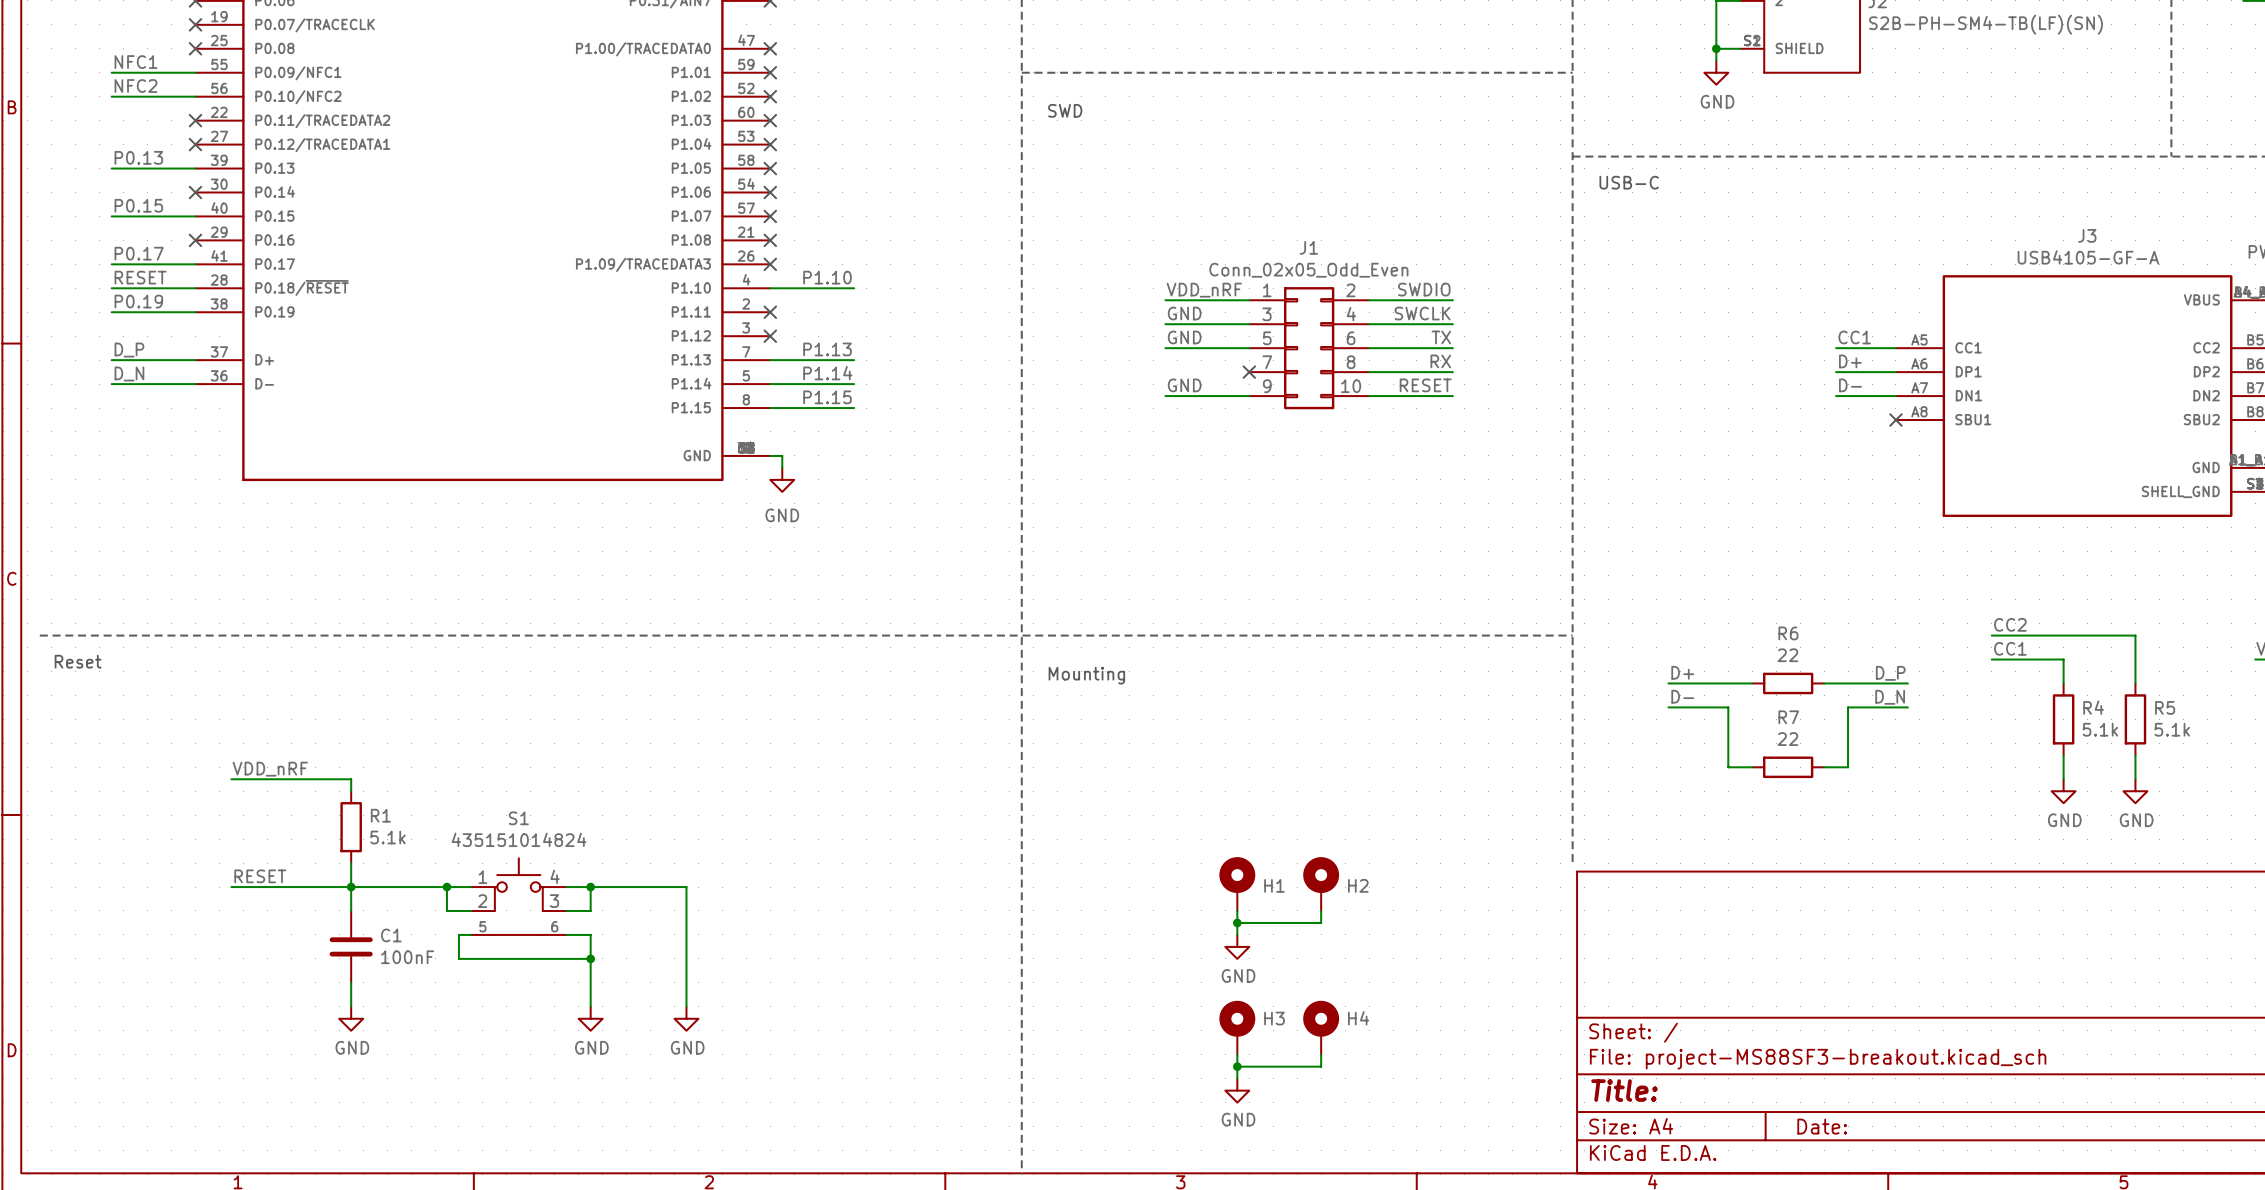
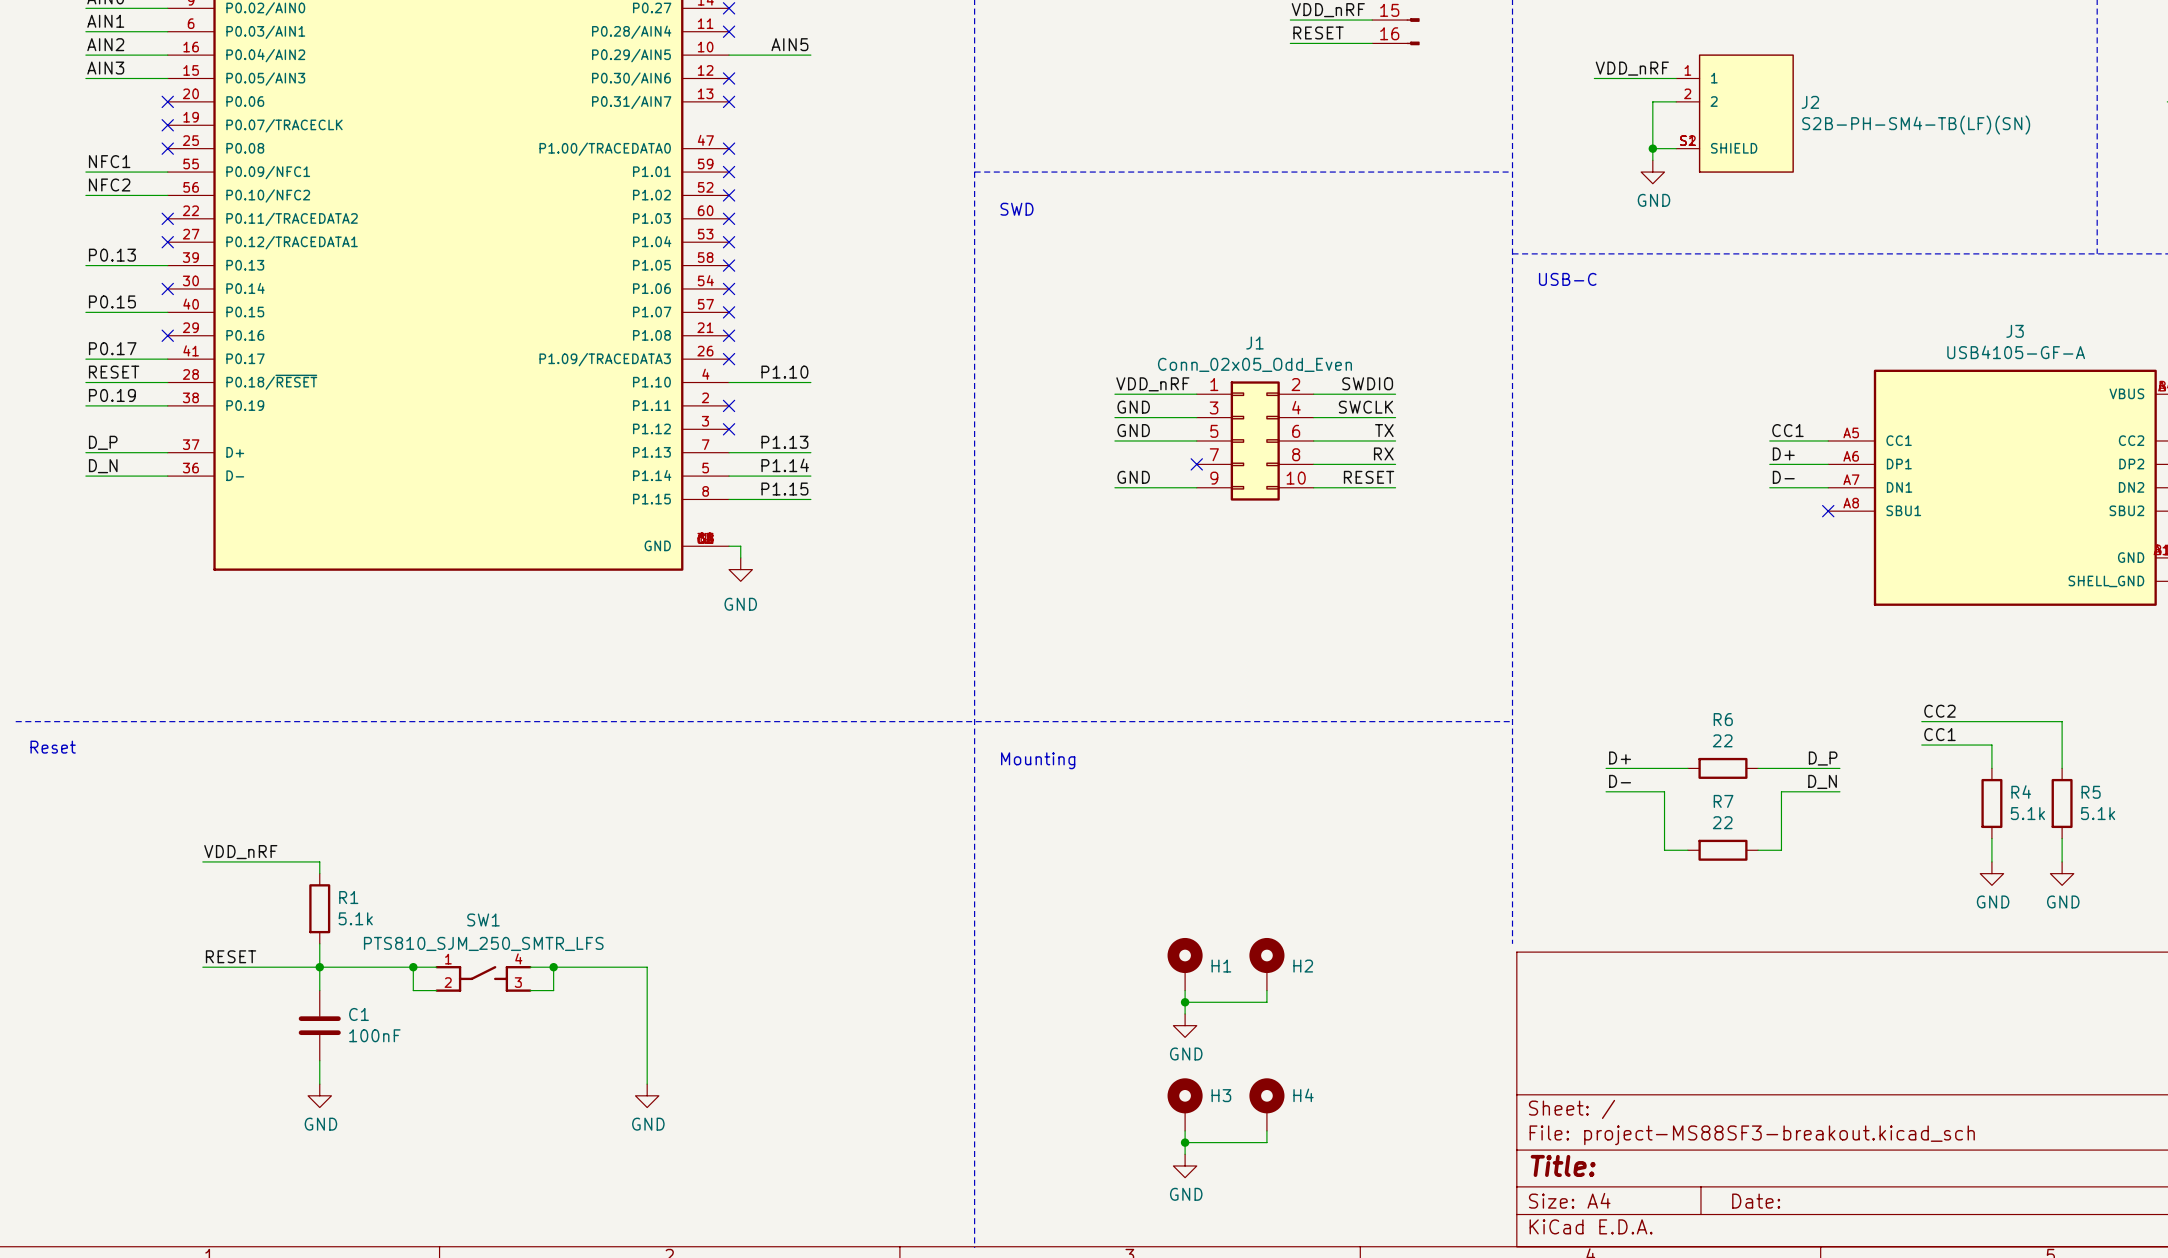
S1: 435151014824 (518, 896) -> none
SW1: none -> PTS810_SJM_250_SMTR_LFS (483, 978)
wire: (470, 934) (458, 934) (458, 958) (590, 958) -> none
wire: (566, 934) (590, 934) (590, 1006) -> none
junction: (590, 958) -> none
power symbol: GND (590, 1018) -> none

